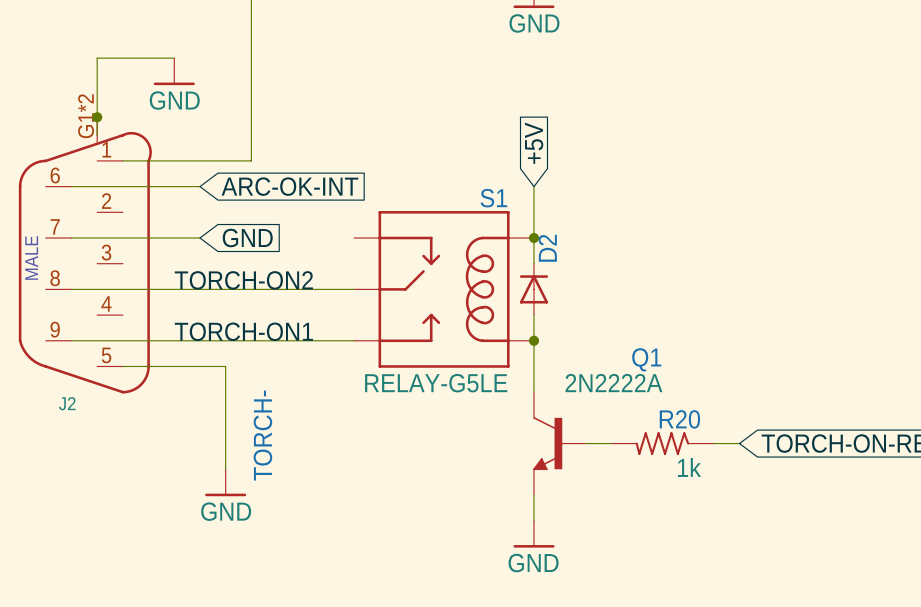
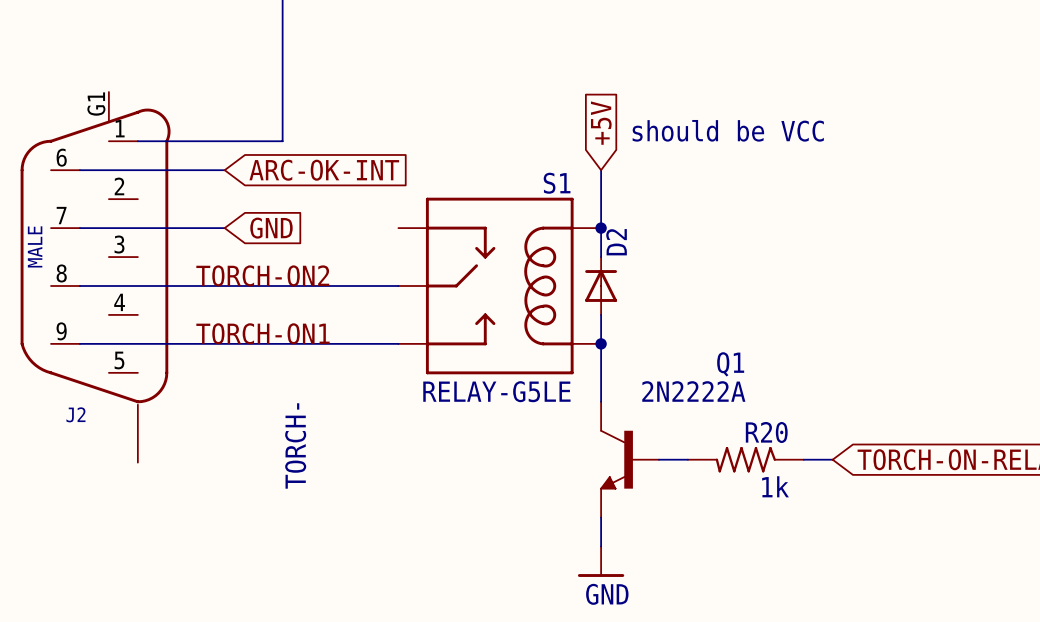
wire: (174, 58) (97, 58) (97, 135) -> none
power symbol: GND (174, 71) -> none
J2 symbol: [18, 117, 152, 394] -> [20, 92, 171, 463]
junction: (97, 117) -> none
text: none -> should be VCC (728, 130)
wire: (122, 366) (225, 366) (225, 469) -> none
power symbol: GND (225, 482) -> none

